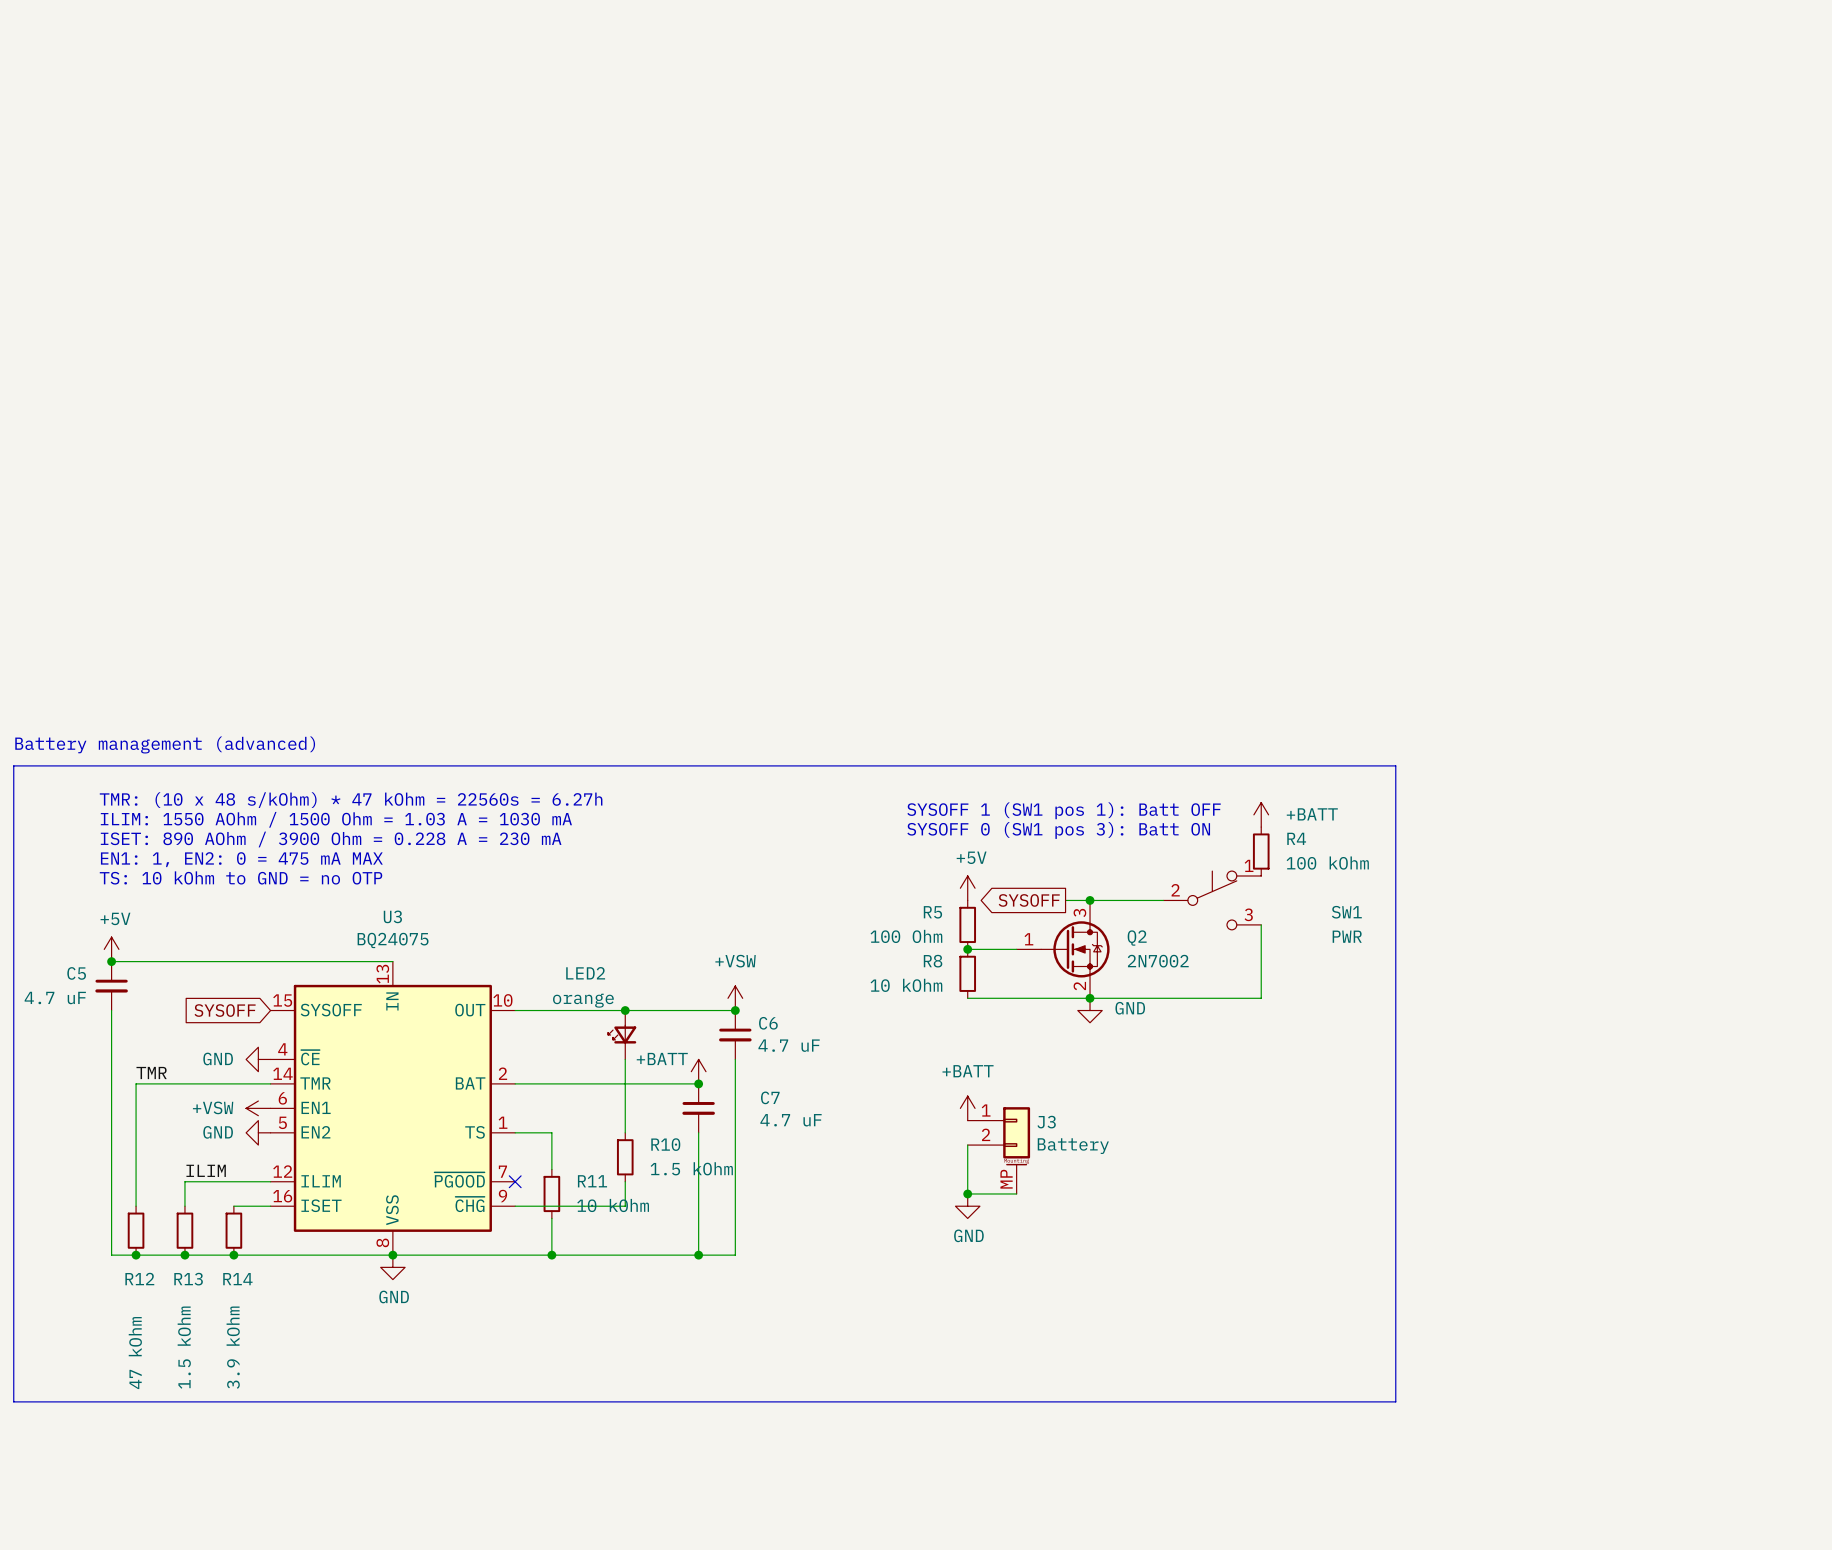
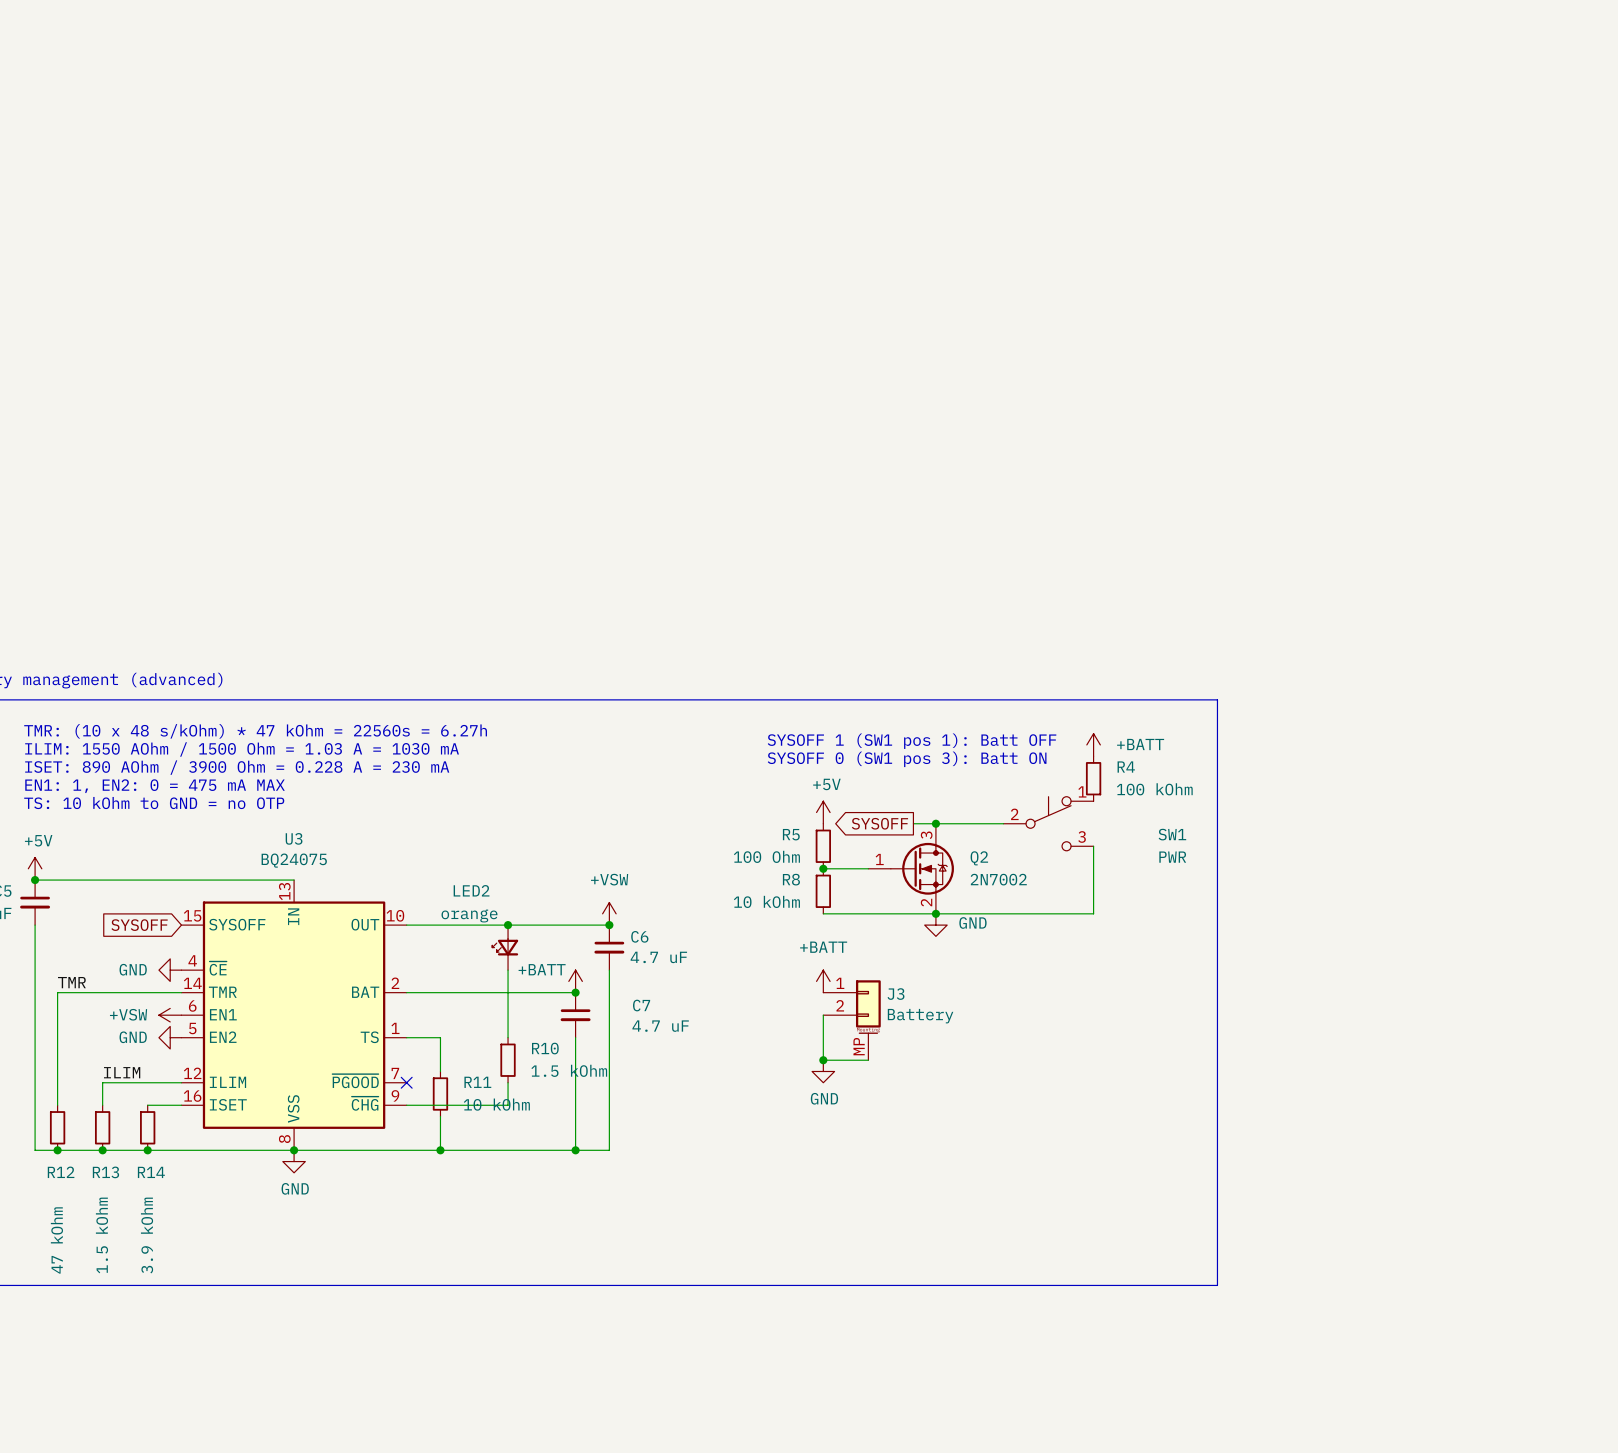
wire: none -> (823, 1015) (823, 1048)
power symbol position: +BATT (967, 1108) -> +BATT (823, 981)
J3 position: (998, 1150) -> (852, 1020)
wire: (967, 1157) (967, 1193) (1016, 1193) -> (823, 1060) (868, 1060)
junction position: (967, 1193) -> (823, 1060)
power symbol position: GND (967, 1206) -> GND (823, 1071)

